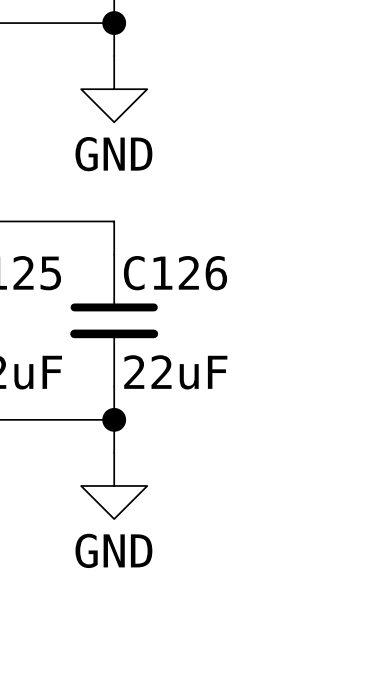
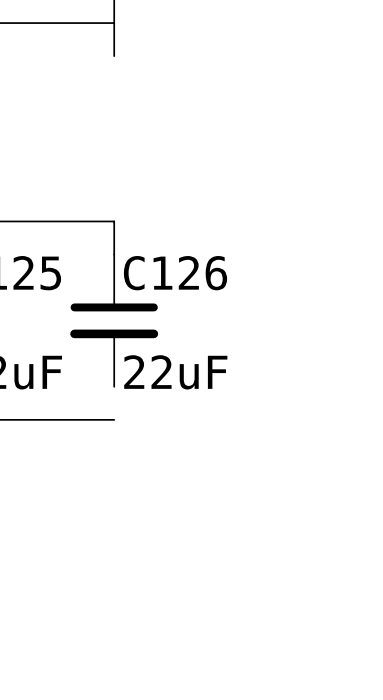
junction: (114, 23) -> none
power symbol: GND (114, 89) -> none
wire: (114, 386) (114, 452) -> none
junction: (114, 419) -> none
power symbol: GND (114, 485) -> none

